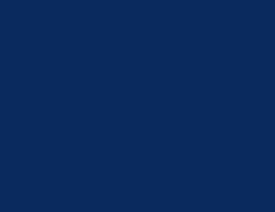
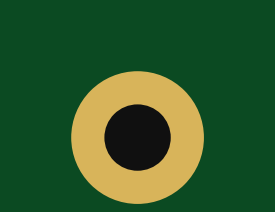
part: none -> (137, 137)

